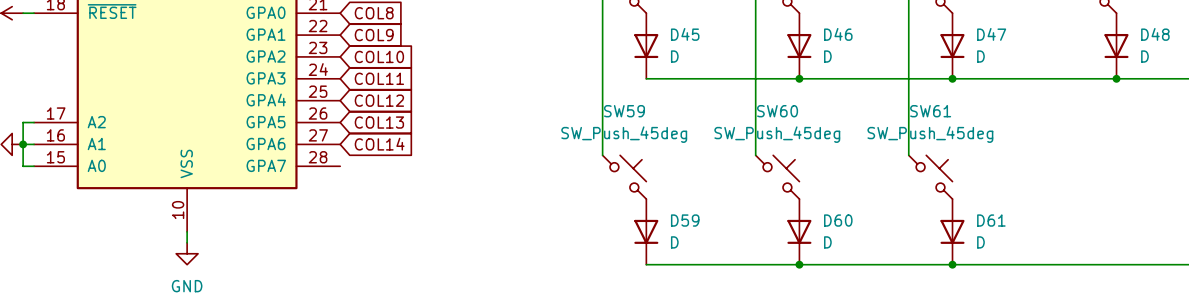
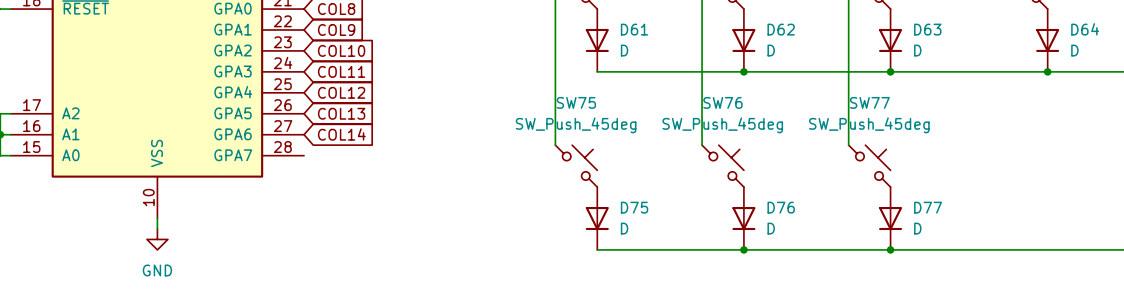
D45 name: D45 (685, 34) -> D61 (634, 29)
D46 name: D46 (838, 34) -> D62 (781, 29)
D47 name: D47 (991, 34) -> D63 (927, 29)
D48 name: D48 (1155, 34) -> D64 (1085, 29)
SW59 name: SW59 (624, 111) -> SW75 (576, 102)
SW60 name: SW60 (777, 111) -> SW76 (722, 102)
SW61 name: SW61 (930, 111) -> SW77 (869, 102)
D59 name: D59 (685, 220) -> D75 (634, 207)
D60 name: D60 (838, 220) -> D76 (781, 207)
D61 name: D61 (991, 220) -> D77 (928, 207)

